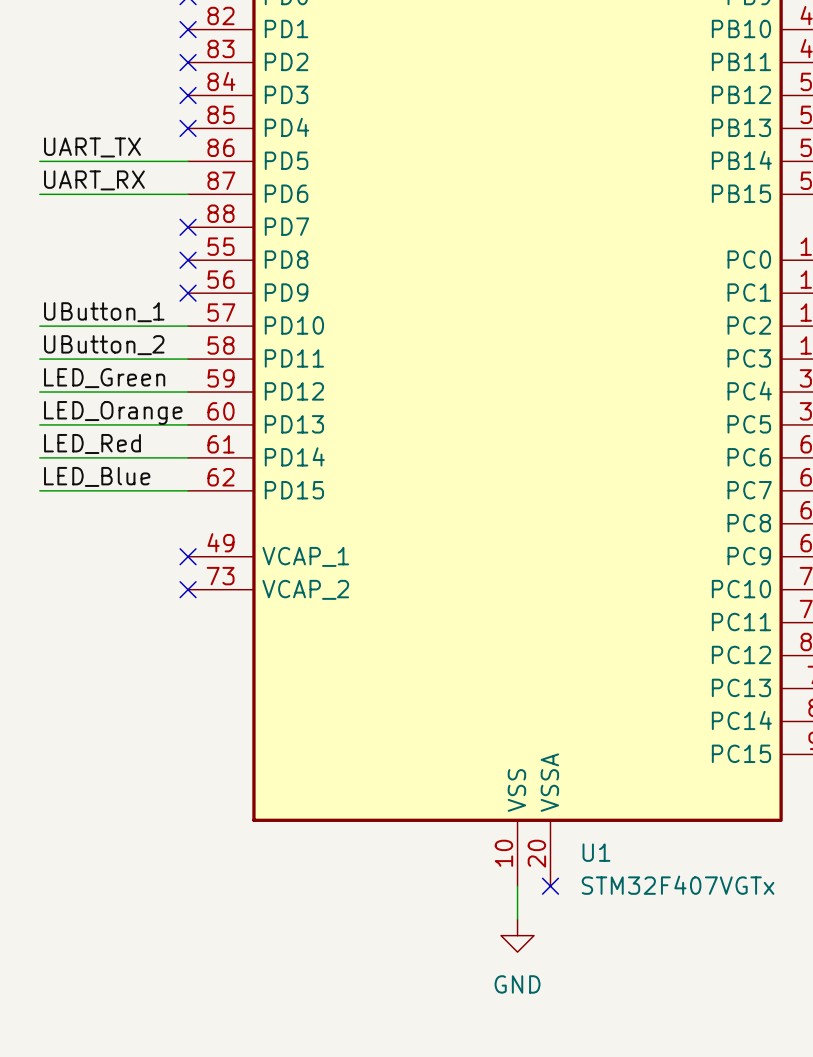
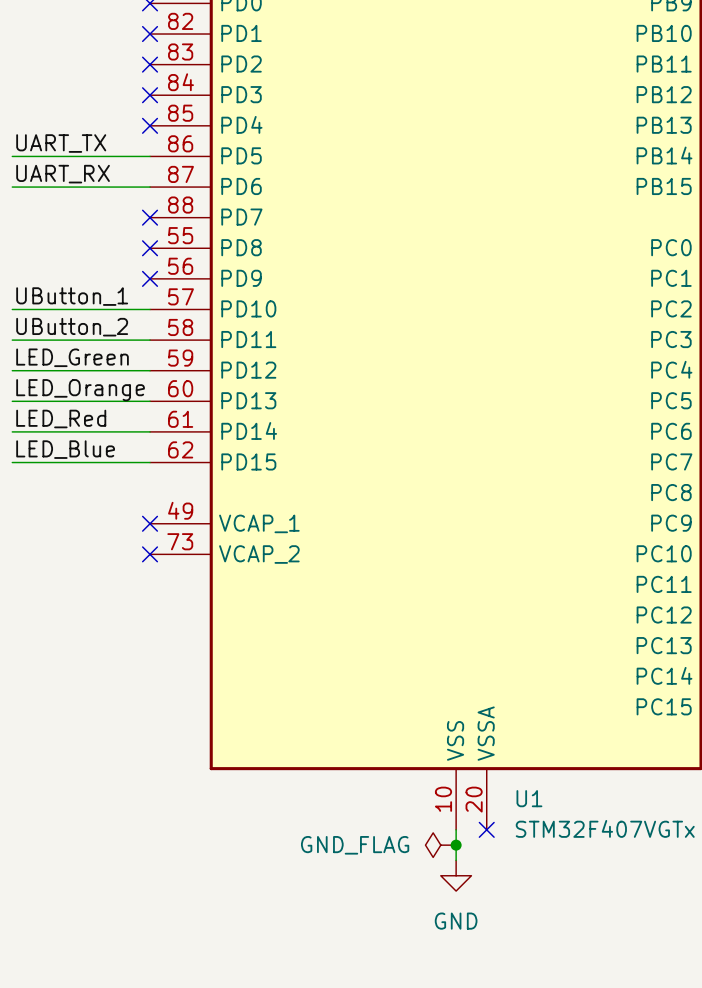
power symbol: none -> GND_FLAG (440, 845)
junction: none -> (456, 845)

